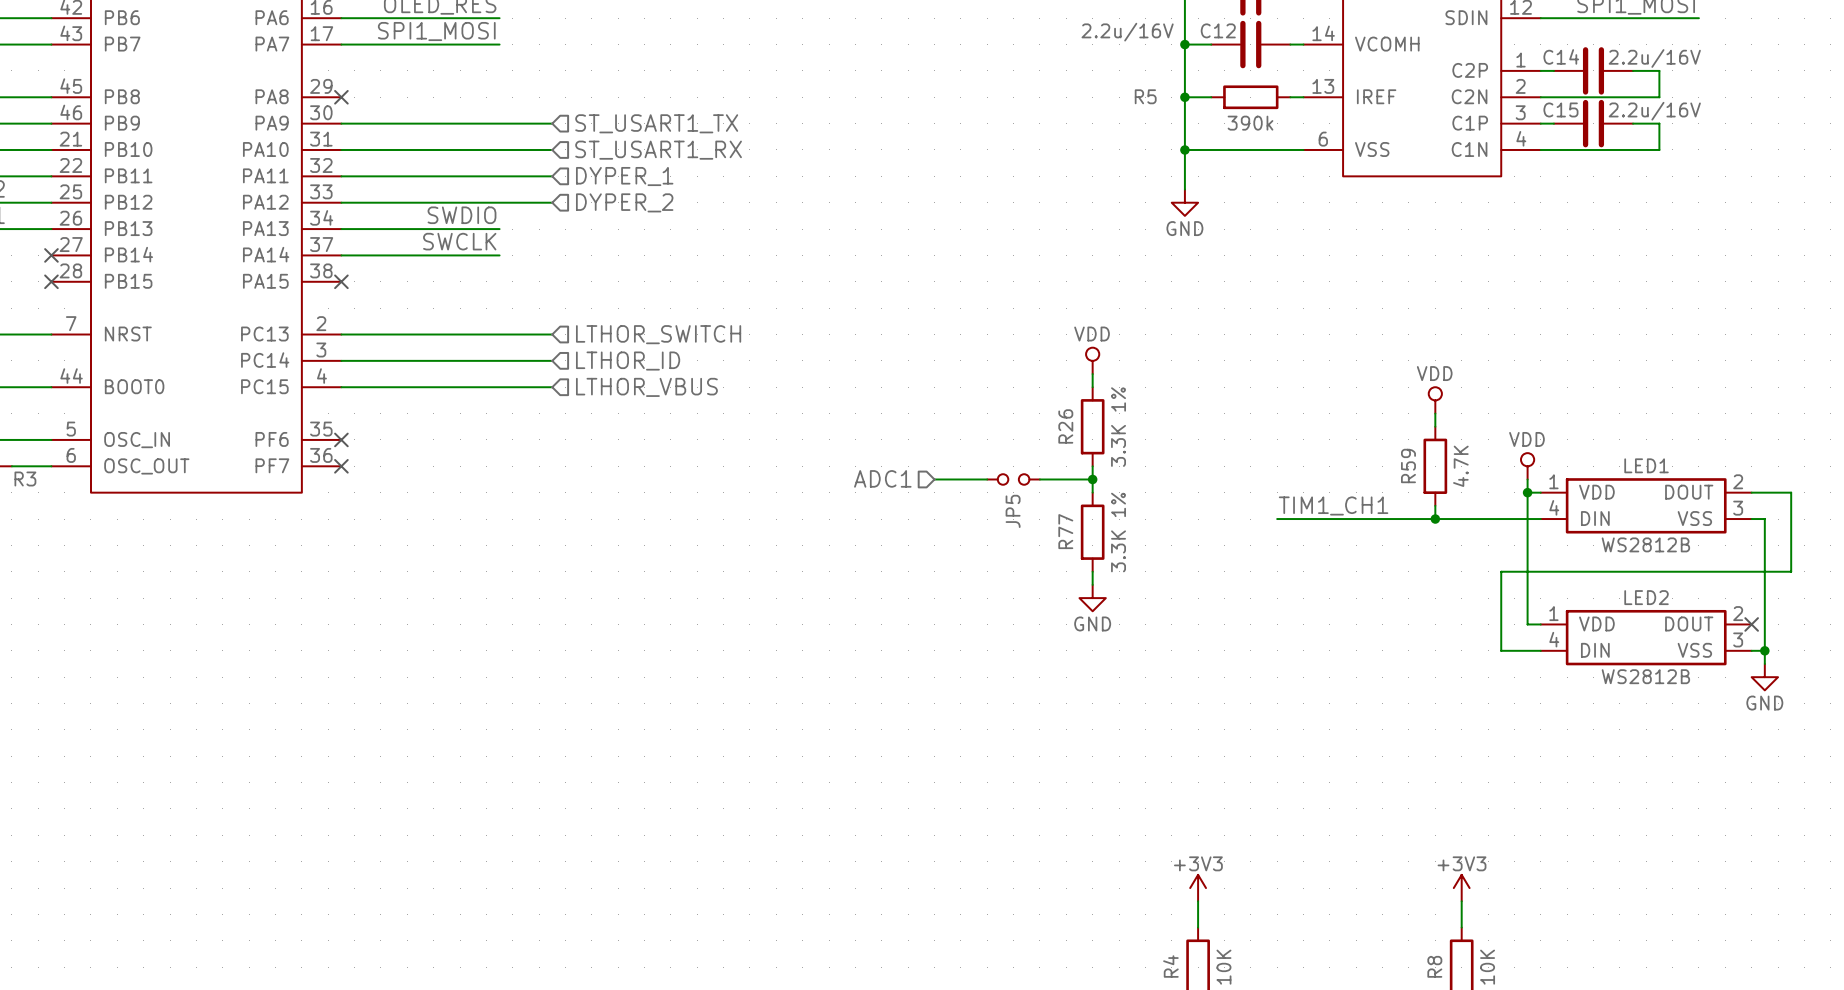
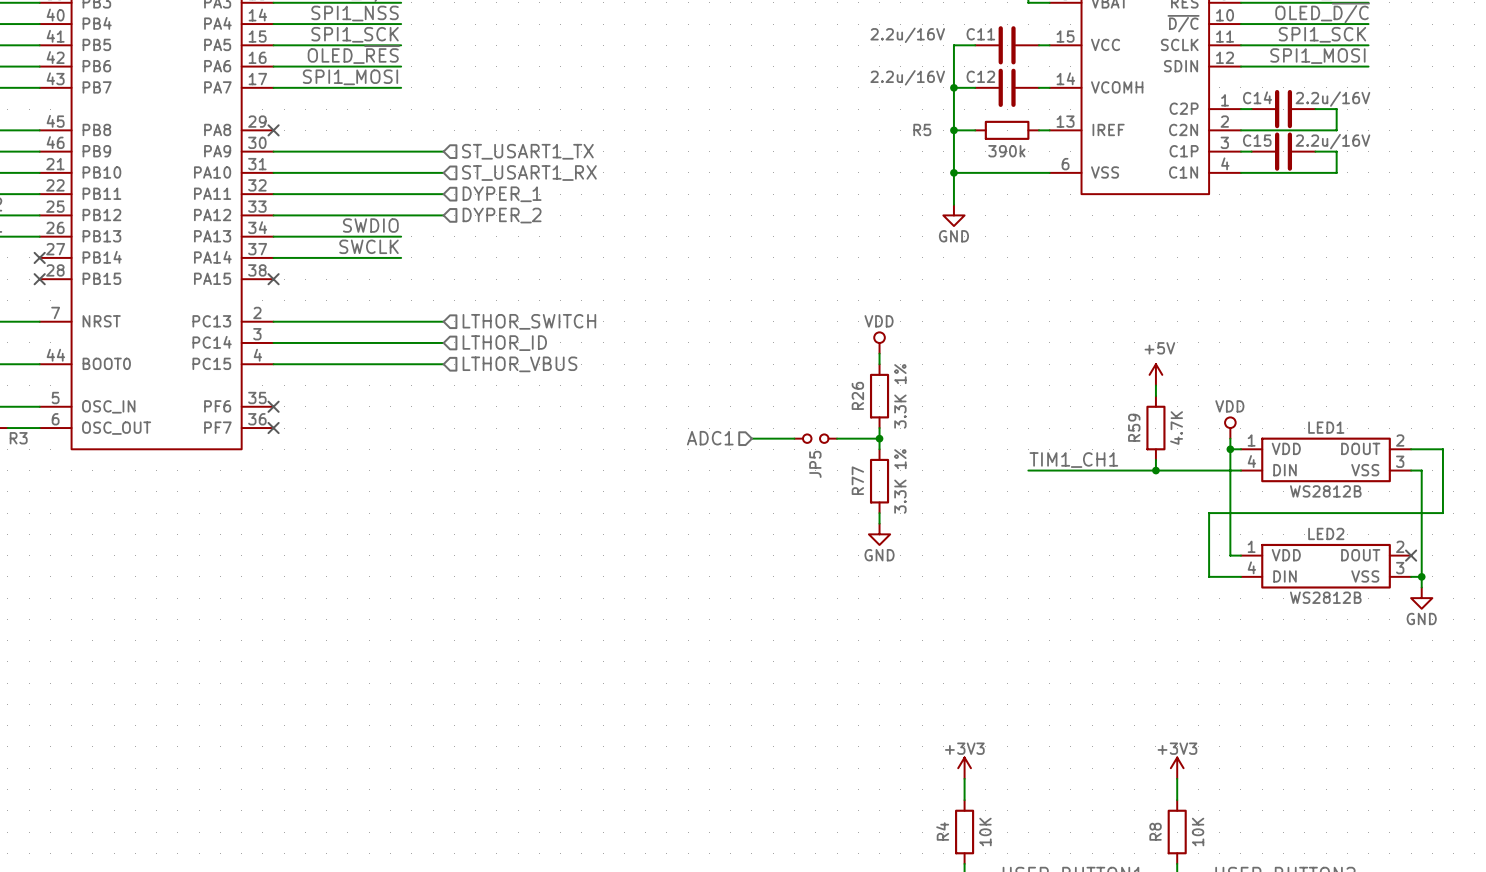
power symbol: VDD (1435, 400) -> +5V (1155, 374)

